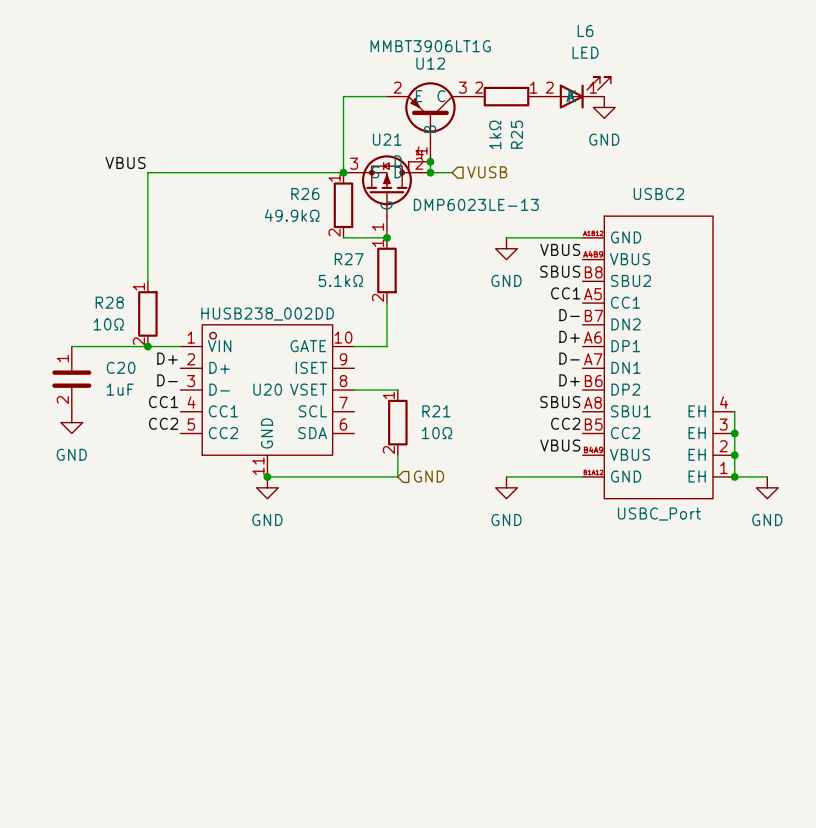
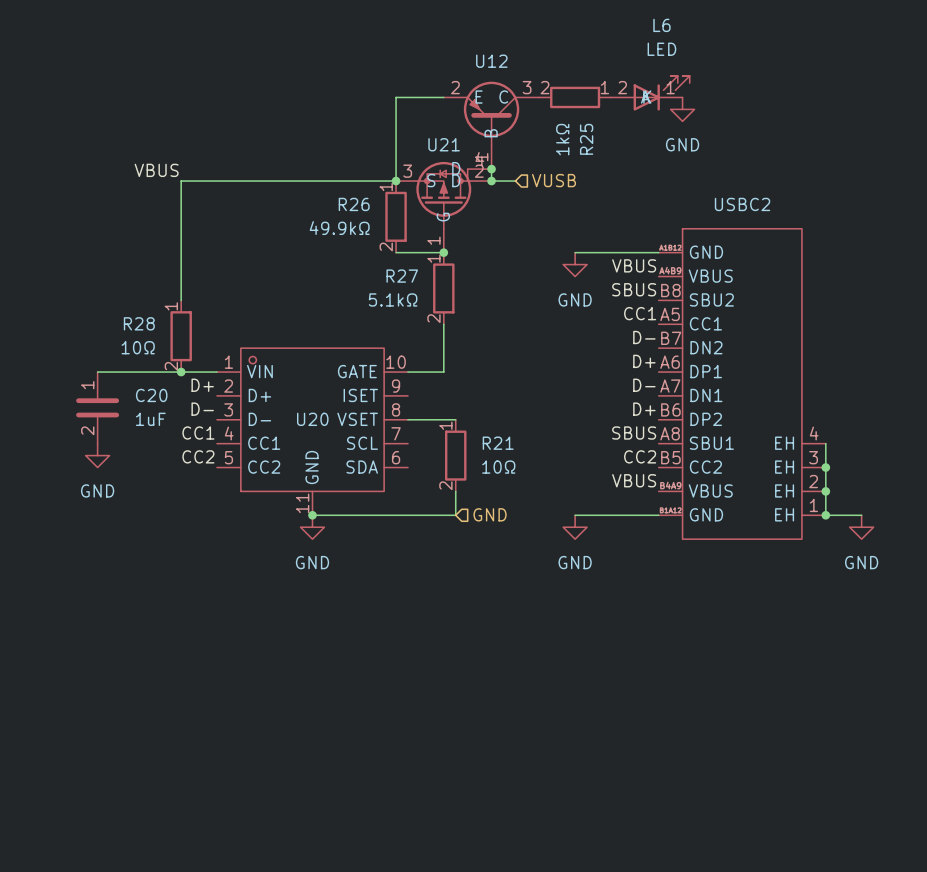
U12 value: MMBT3906LT1G (430, 46) -> none
U21 value: DMP6023LE-13 (476, 204) -> none
U20 value: HUSB238_002DD (267, 314) -> none
USBC2 value: USBC_Port (659, 514) -> none

